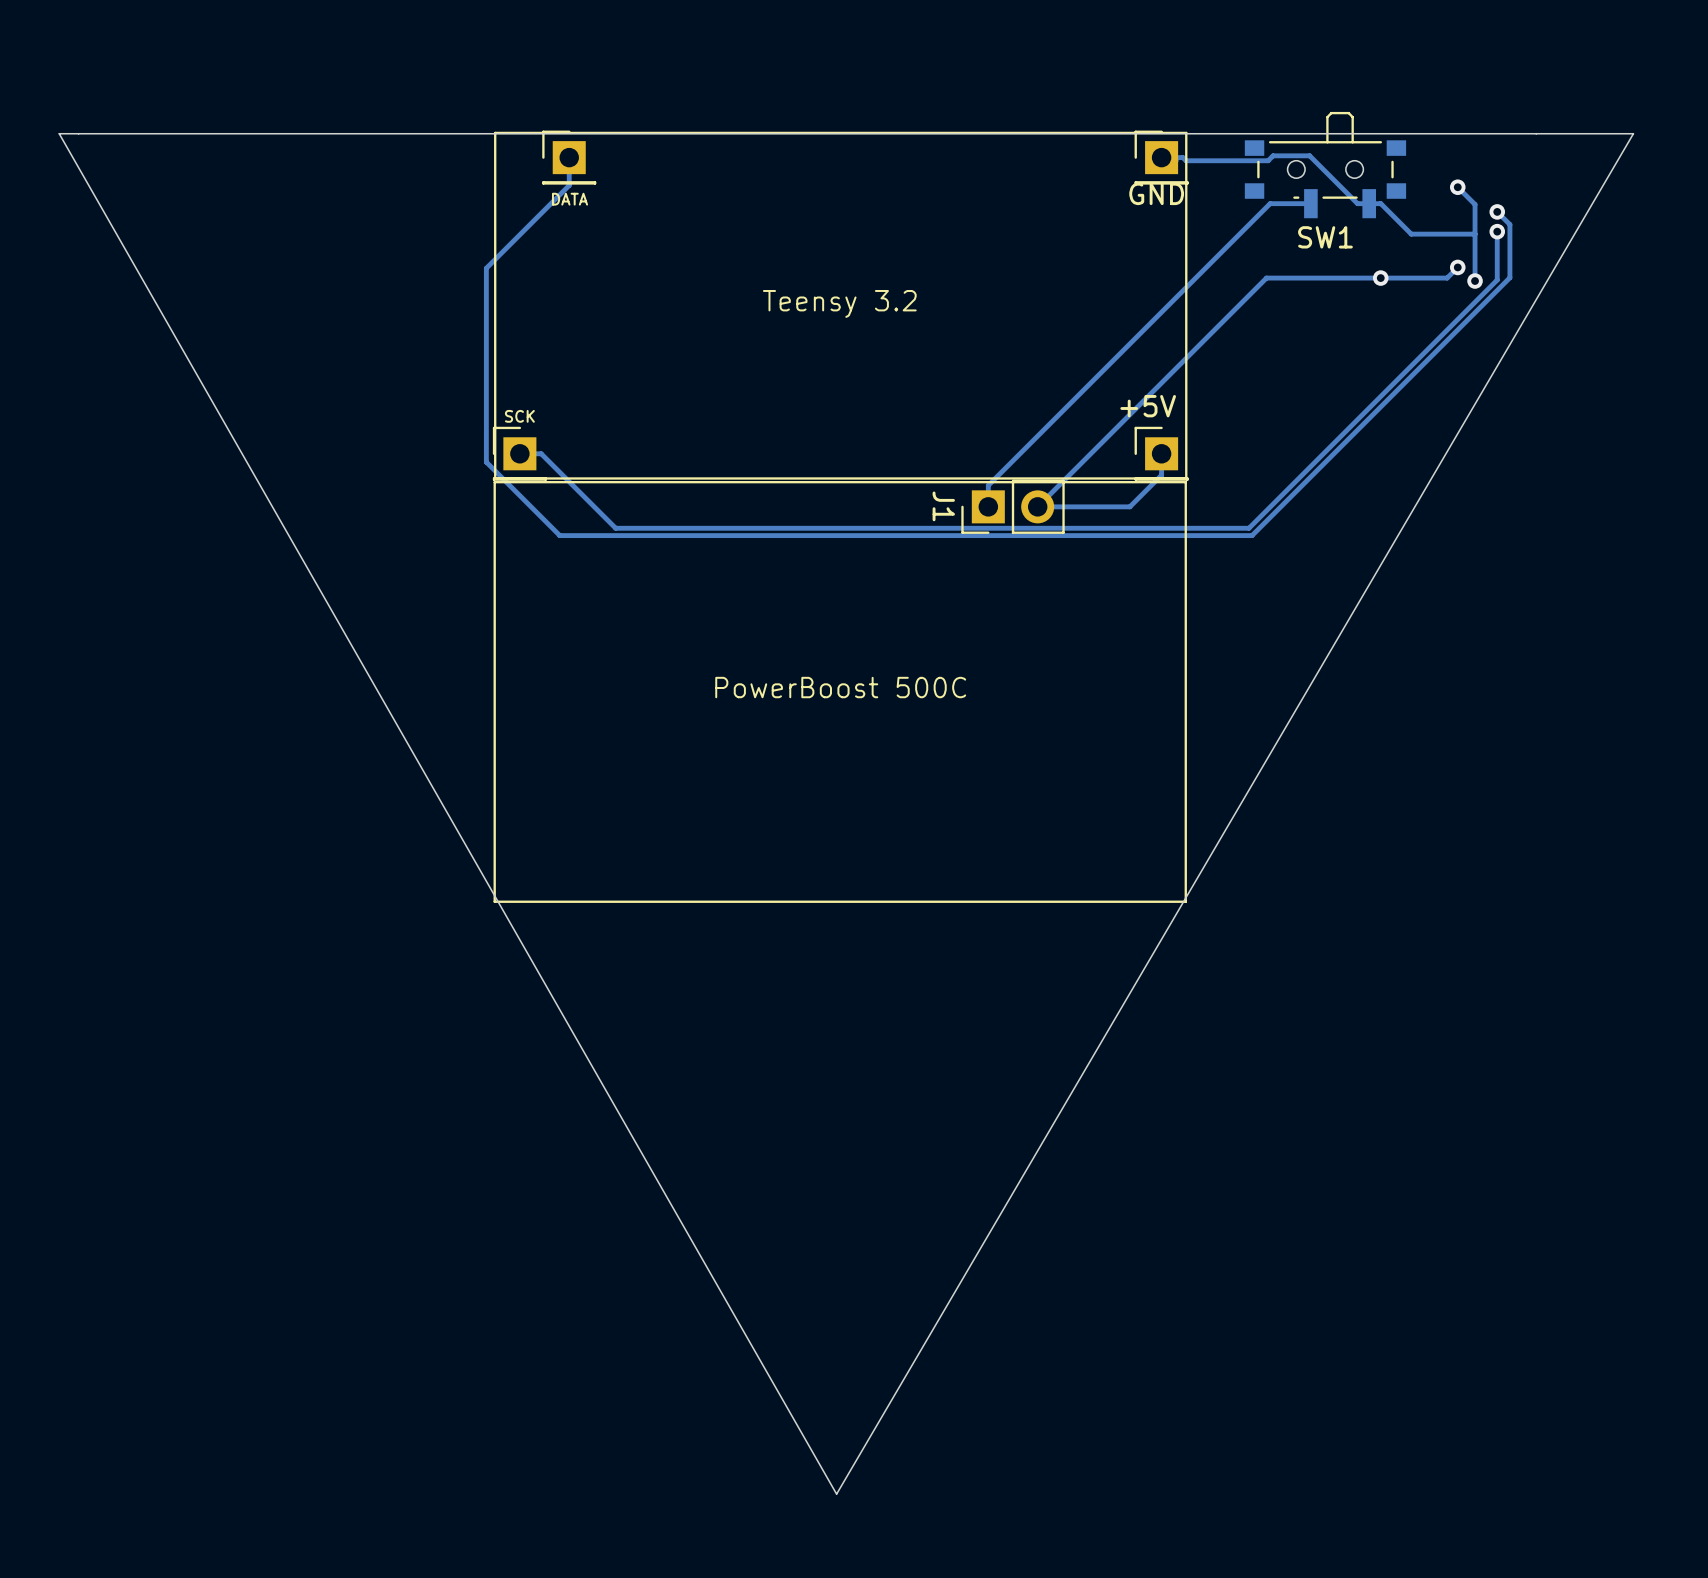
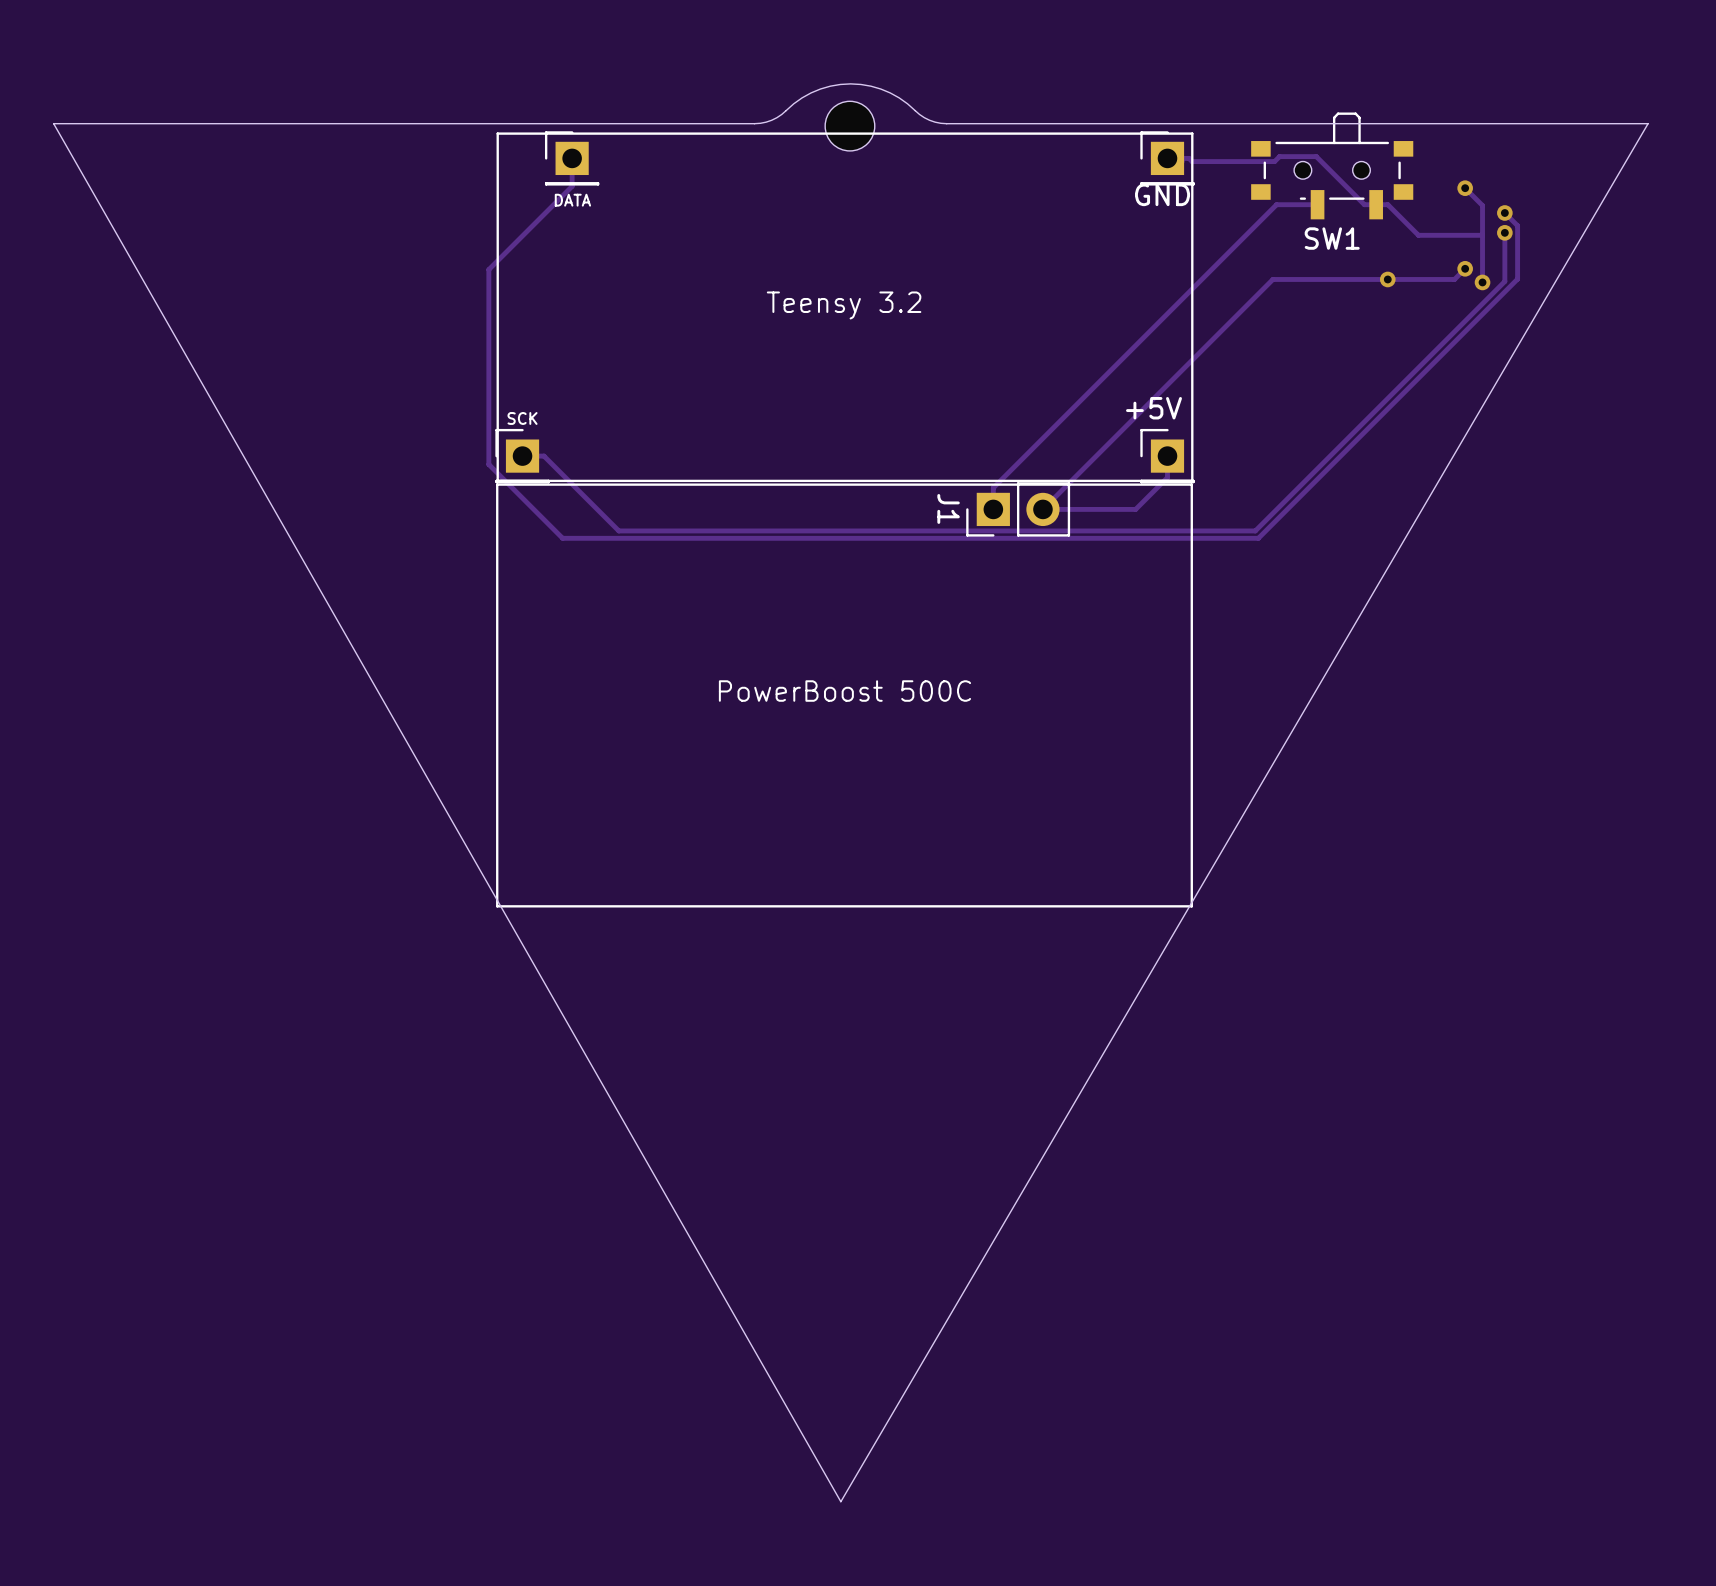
part: none -> (849, 126)
board edge: (1633, 133) (59, 133) (836, 1494) (1633, 133) -> (915, 110) (899, 97) (880, 89) (850, 83) (830, 86) (811, 92) (776, 117) (766, 122) (754, 123) (53, 123) (840, 1501) (1648, 123) (946, 123) (929, 120) (915, 110)

